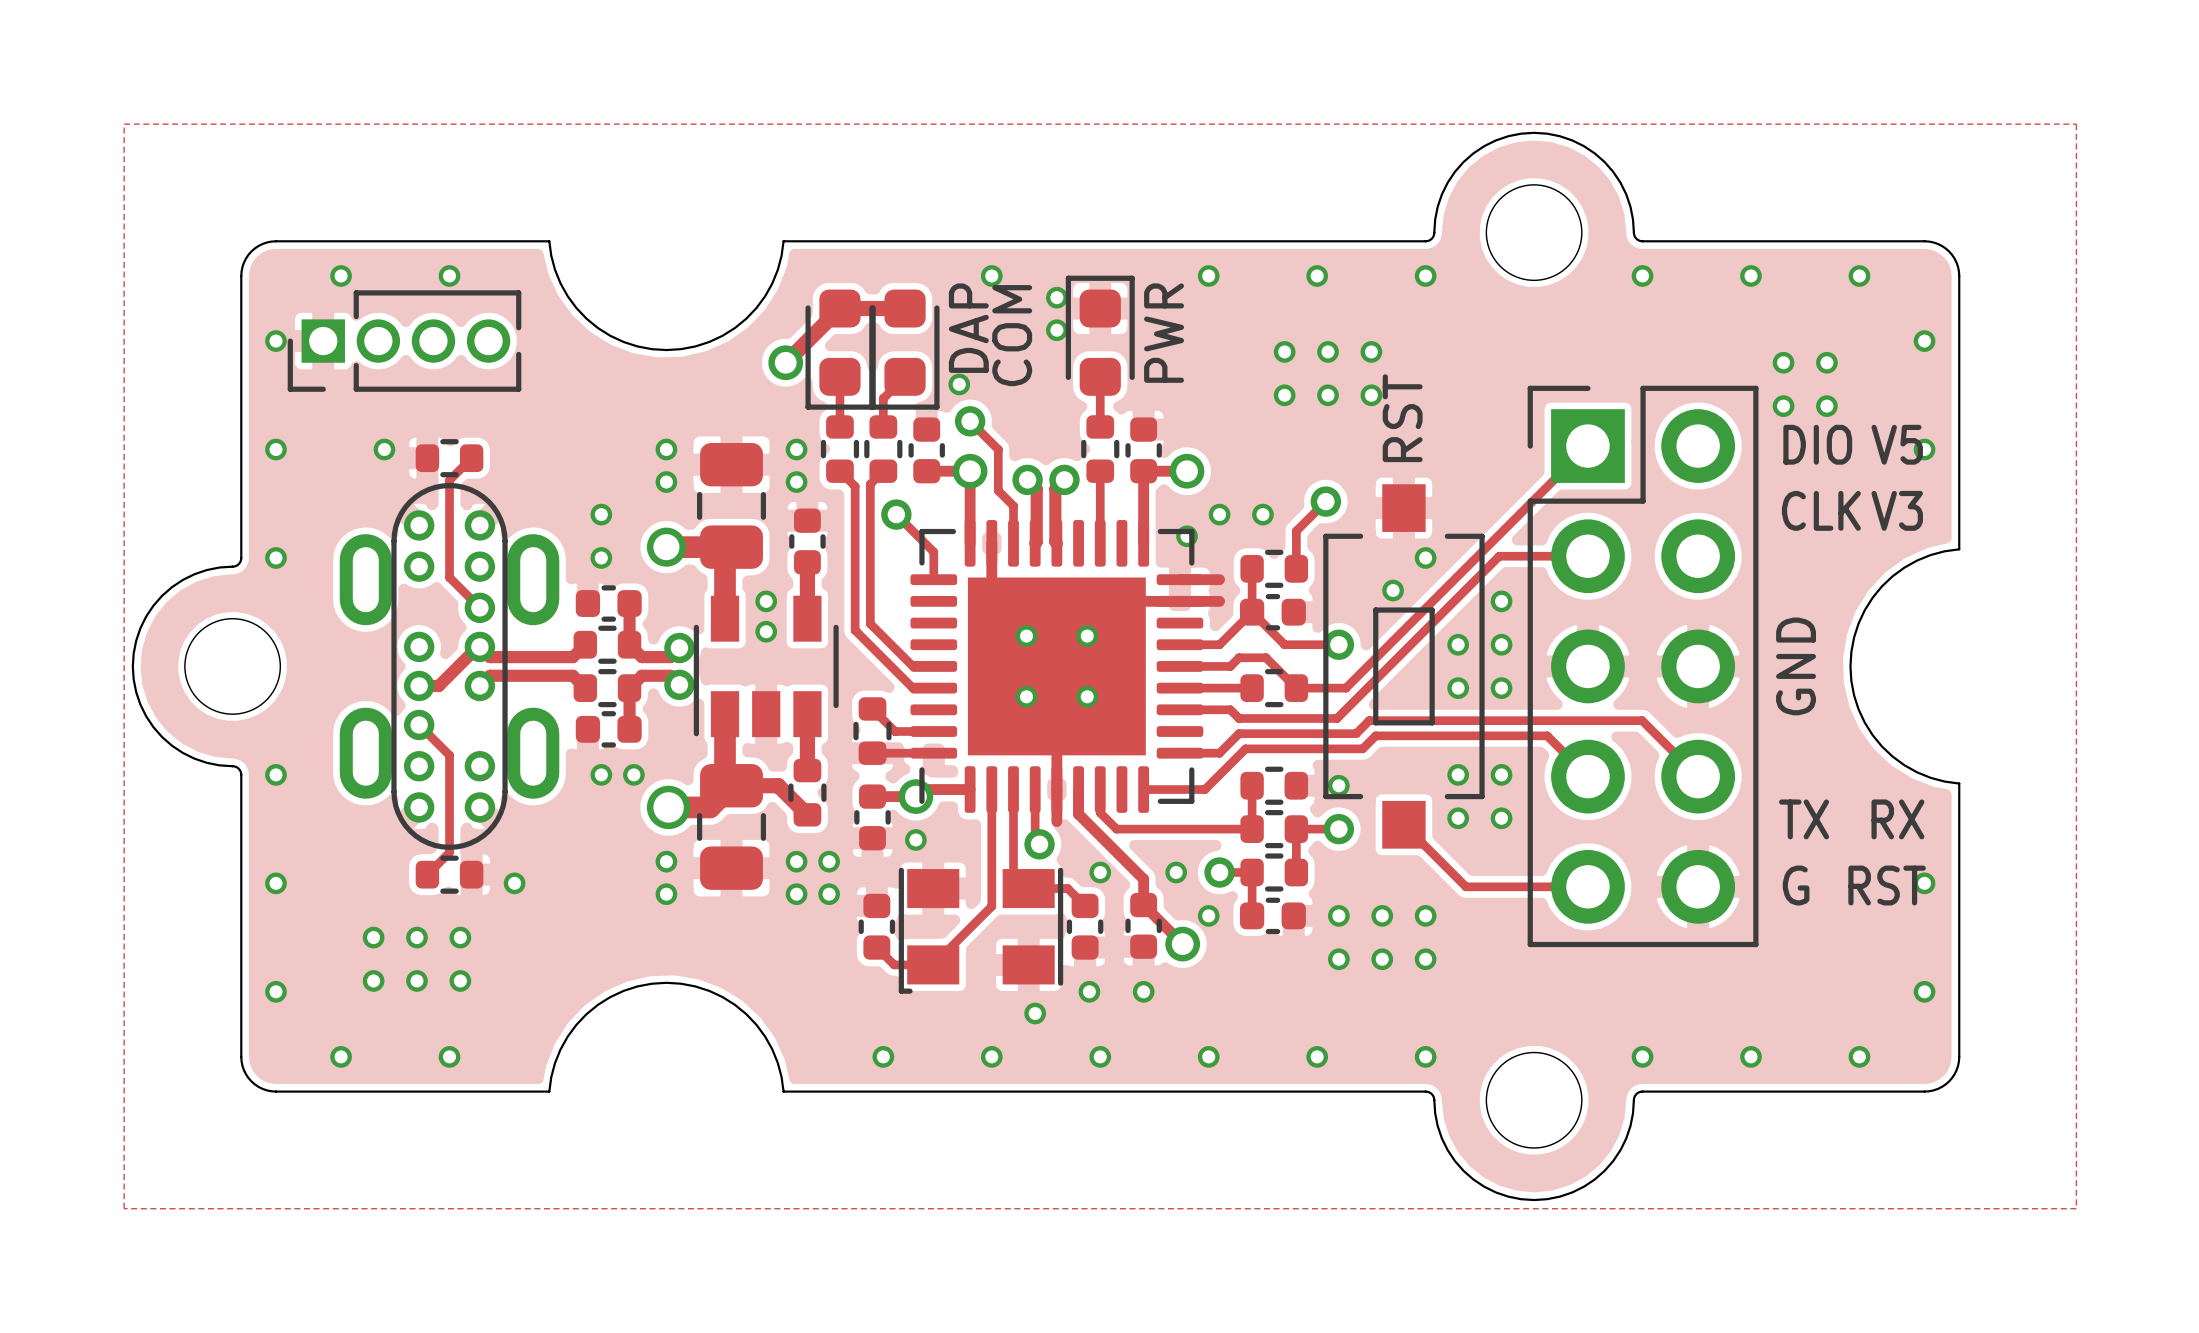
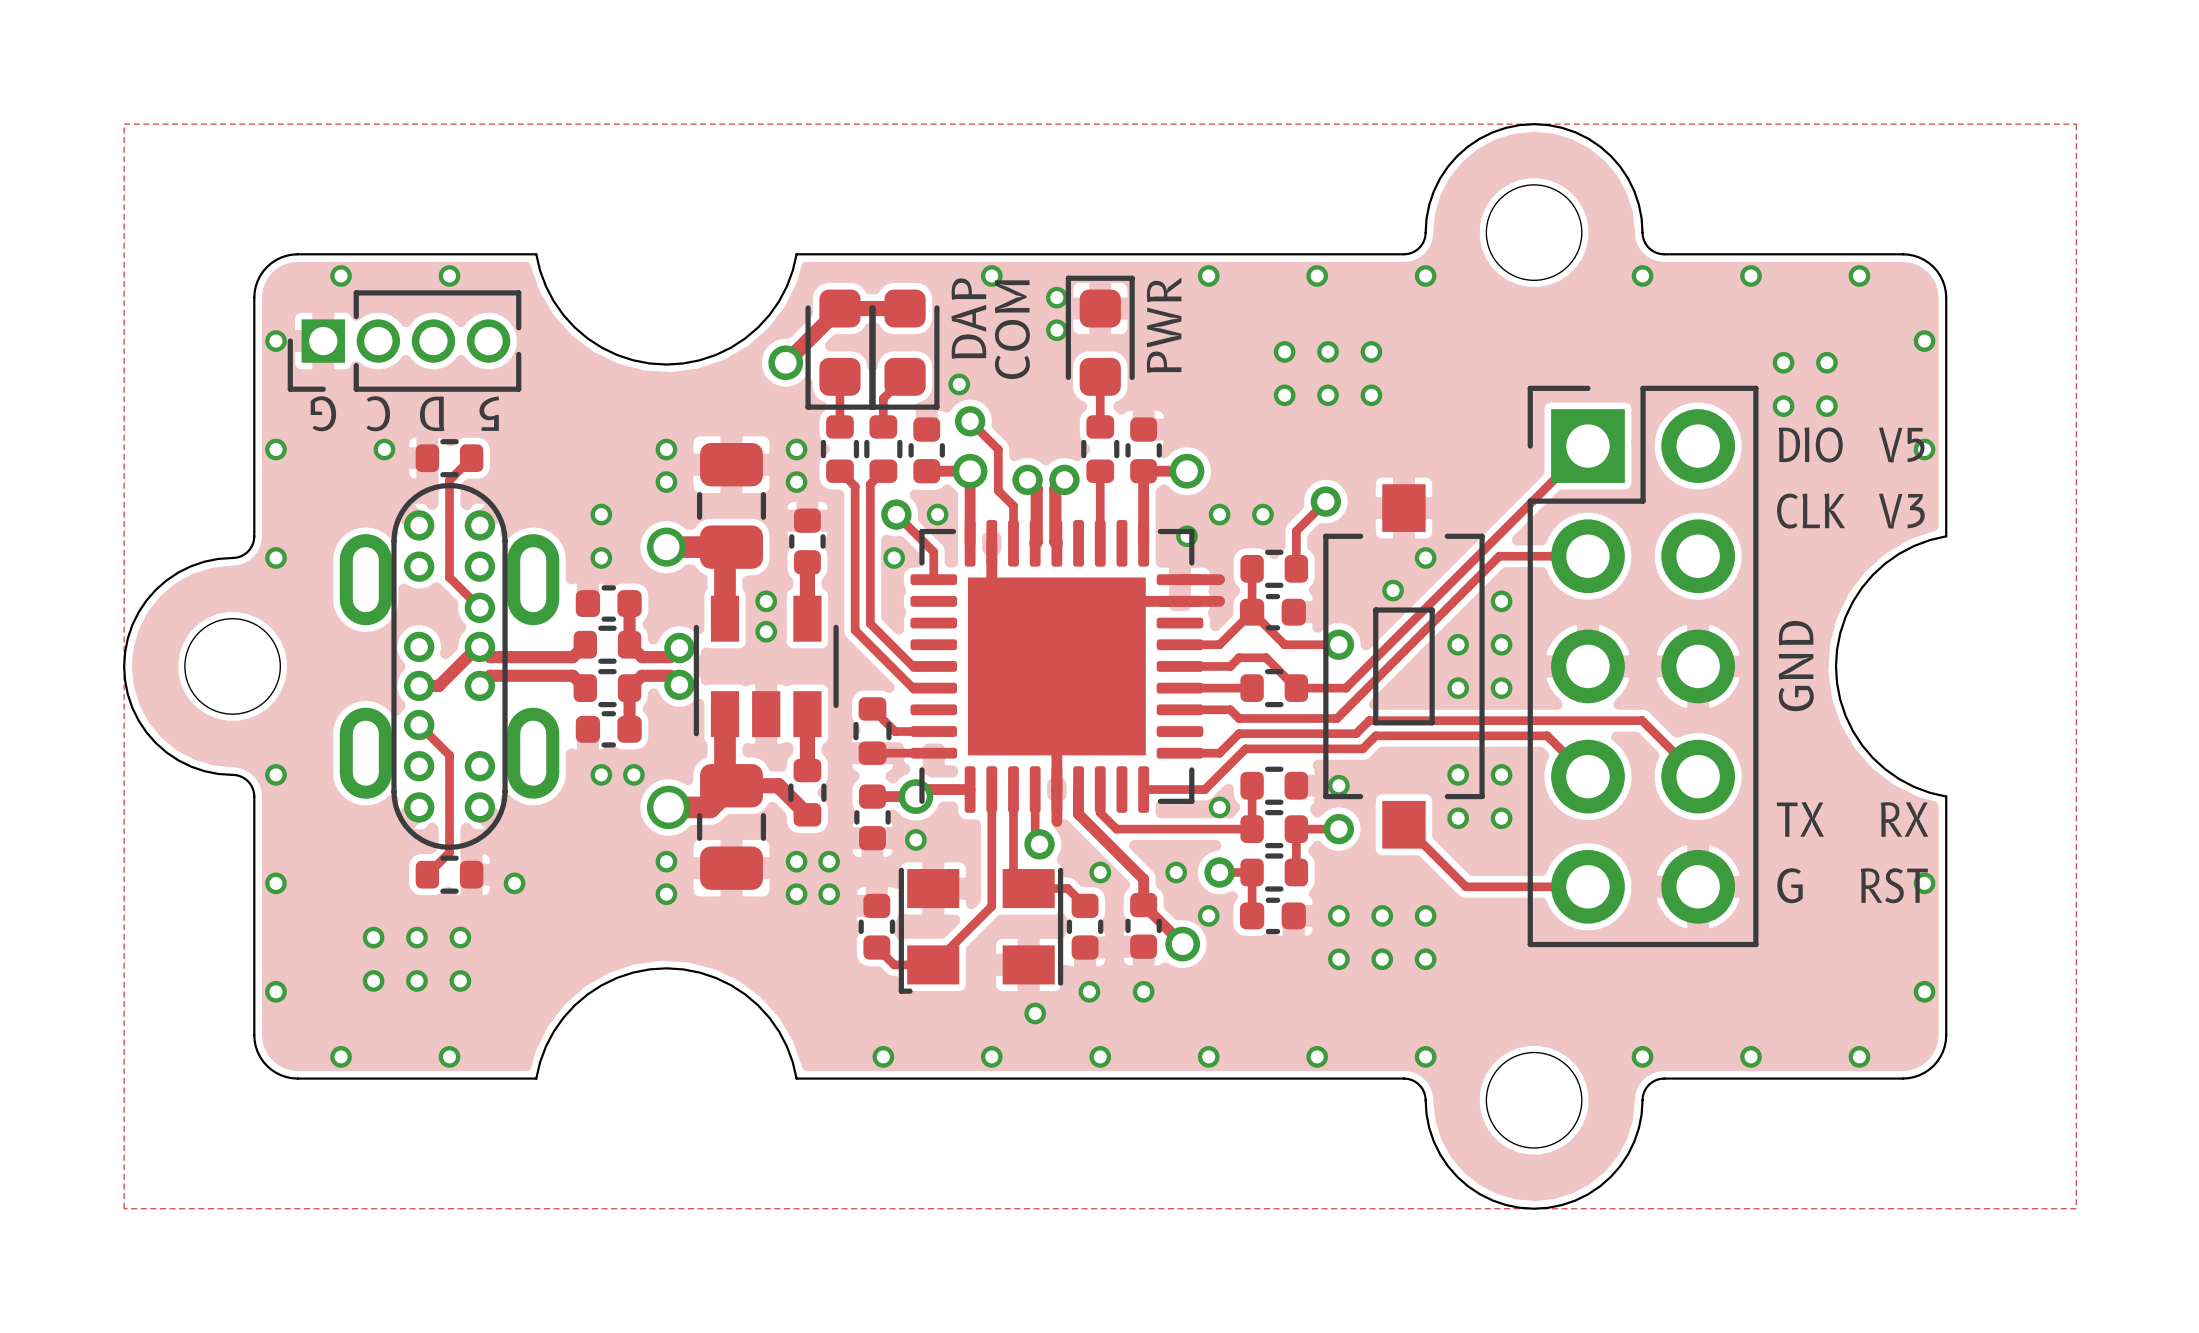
board edge: (1434, 232) (1431, 238) (1425, 241) (783, 241) (781, 255) (772, 283) (765, 296) (746, 318) (722, 335) (709, 341) (681, 349) (666, 350) (651, 349) (623, 341) (597, 327) (586, 318) (576, 308) (560, 283) (555, 269) (549, 241) (275, 241) (262, 243) (254, 248) (245, 258) (241, 275) (240, 560) (234, 566) (219, 567) (194, 574) (171, 587) (162, 595) (153, 605) (140, 628) (133, 653) (132, 666) (133, 679) (140, 704) (153, 727) (162, 736) (171, 745) (194, 758) (219, 765) (234, 766) (240, 772) (241, 1056) (243, 1070) (248, 1078) (258, 1086) (275, 1091) (549, 1091) (551, 1077) (560, 1049) (567, 1036) (586, 1014) (610, 997) (637, 986) (651, 983) (681, 983) (709, 990) (722, 997) (735, 1004) (756, 1024) (772, 1049) (777, 1062) (783, 1091) (1426, 1091) (1434, 1098) (1435, 1113) (1441, 1138) (1447, 1150) (1463, 1170) (1484, 1186) (1495, 1192) (1521, 1199) (1534, 1200) (1547, 1199) (1572, 1192) (1583, 1186) (1604, 1170) (1620, 1150) (1626, 1138) (1633, 1113) (1634, 1098) (1640, 1091) (1924, 1091) (1937, 1088) (1945, 1084) (1956, 1070) (1959, 1056) (1959, 783) (1944, 781) (1917, 772) (1892, 756) (1881, 746) (1864, 722) (1858, 709) (1854, 695) (1850, 666) (1854, 637) (1858, 623) (1872, 597) (1881, 586) (1892, 576) (1917, 560) (1944, 551) (1959, 549) (1959, 275) (1954, 258) (1941, 245) (1924, 241) (1640, 240) (1634, 234) (1633, 219) (1626, 194) (1613, 171) (1604, 162) (1594, 153) (1572, 140) (1547, 133) (1534, 132) (1521, 133) (1495, 140) (1473, 153) (1463, 162) (1454, 171) (1441, 194) (1435, 219) (1434, 232) -> (1425, 232) (1423, 240) (1419, 247) (1412, 252) (1403, 254) (796, 254) (786, 286) (779, 301) (769, 315) (745, 338) (715, 354) (699, 360) (666, 364) (633, 360) (617, 354) (601, 347) (574, 327) (563, 315) (546, 286) (536, 254) (297, 254) (281, 257) (271, 263) (260, 275) (254, 292) (254, 536) (252, 544) (247, 551) (240, 556) (218, 558) (191, 566) (166, 580) (155, 589) (146, 600) (132, 624) (125, 652) (124, 666) (125, 680) (132, 707) (146, 732) (155, 743) (166, 752) (191, 766) (218, 773) (240, 776) (247, 781) (252, 788) (254, 796) (254, 1035) (257, 1051) (263, 1061) (281, 1075) (297, 1078) (536, 1078) (546, 1046) (553, 1031) (563, 1017) (587, 994) (601, 985) (633, 972) (649, 969) (683, 969) (715, 977) (730, 985) (757, 1005) (769, 1017) (786, 1046) (796, 1078) (1409, 1079) (1417, 1083) (1423, 1091) (1426, 1114) (1433, 1141) (1440, 1154) (1457, 1176) (1468, 1186) (1492, 1200) (1519, 1207) (1534, 1208) (1548, 1207) (1575, 1200) (1600, 1186) (1610, 1176) (1628, 1154) (1634, 1141) (1641, 1114) (1644, 1091) (1648, 1084) (1655, 1080) (1664, 1078) (1902, 1078) (1919, 1075) (1929, 1069) (1940, 1056) (1946, 1035) (1946, 796) (1914, 786) (1899, 779) (1872, 757) (1862, 745) (1845, 715) (1837, 683) (1835, 666) (1840, 633) (1845, 617) (1852, 601) (1872, 574) (1885, 563) (1914, 546) (1946, 536) (1946, 297) (1940, 275) (1929, 263) (1908, 254) (1664, 254) (1655, 252) (1648, 247) (1644, 240) (1638, 204) (1628, 178) (1620, 166) (1610, 155) (1588, 138) (1575, 132) (1548, 125) (1519, 125) (1506, 127) (1492, 132) (1468, 146) (1448, 166) (1440, 178) (1429, 204) (1425, 232)
text: none -> G (323, 413)
text: none -> C (378, 413)
text: none -> D (432, 413)
text: none -> 5 (489, 413)
text: RST (1402, 418) -> none
via: none -> (937, 514)
via: none -> (894, 557)
via: (1026, 636) -> none
via: (1087, 636) -> none
via: (1026, 696) -> none
via: (1087, 696) -> none
via: none -> (1219, 807)

